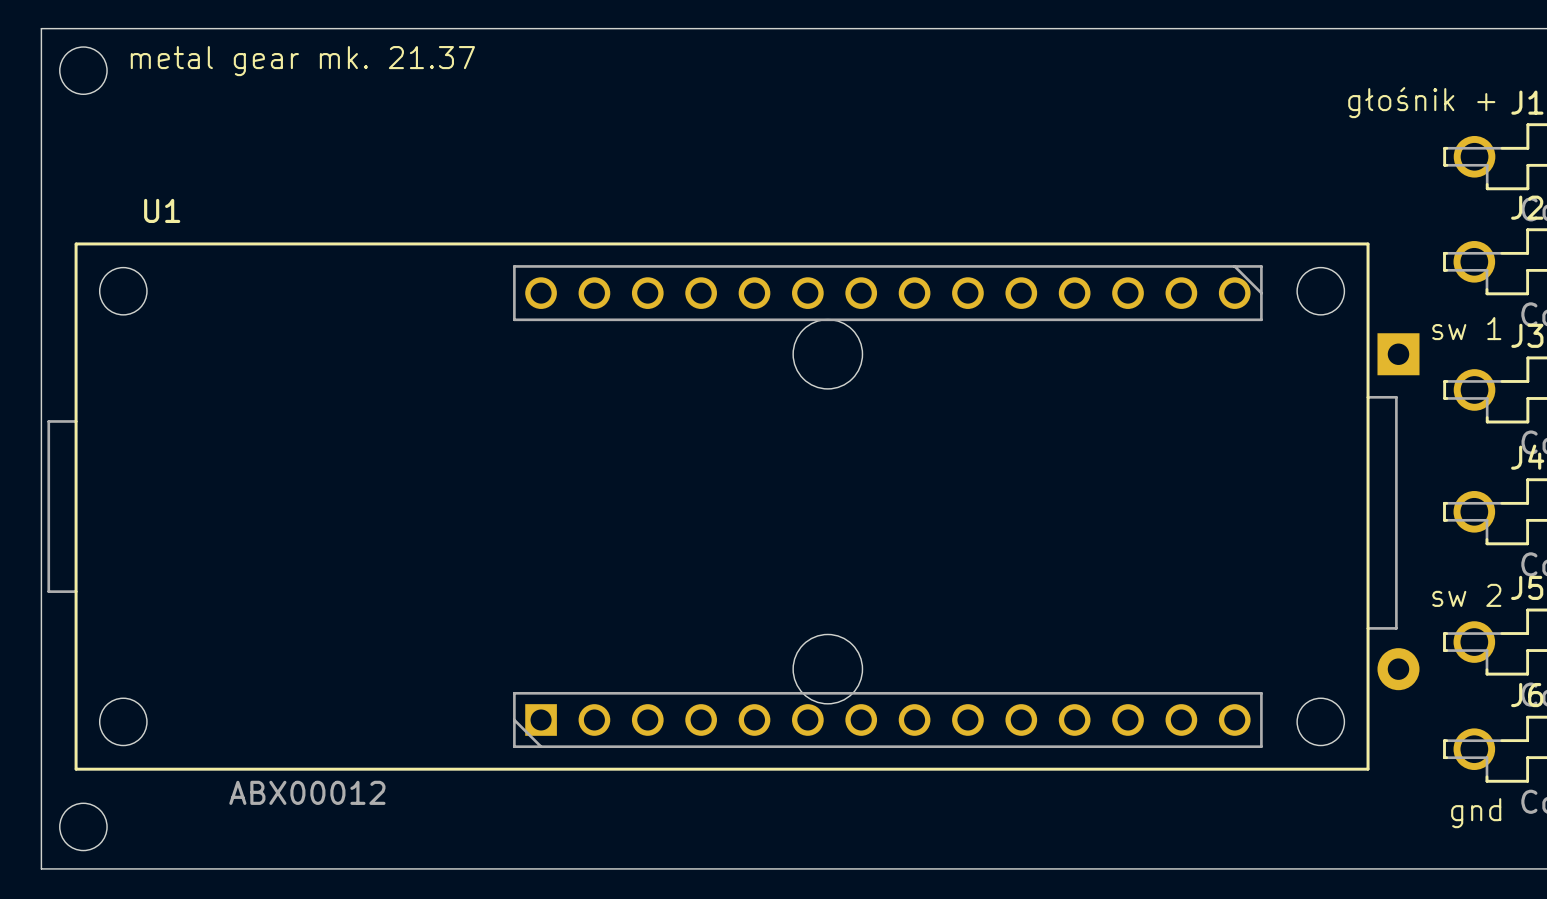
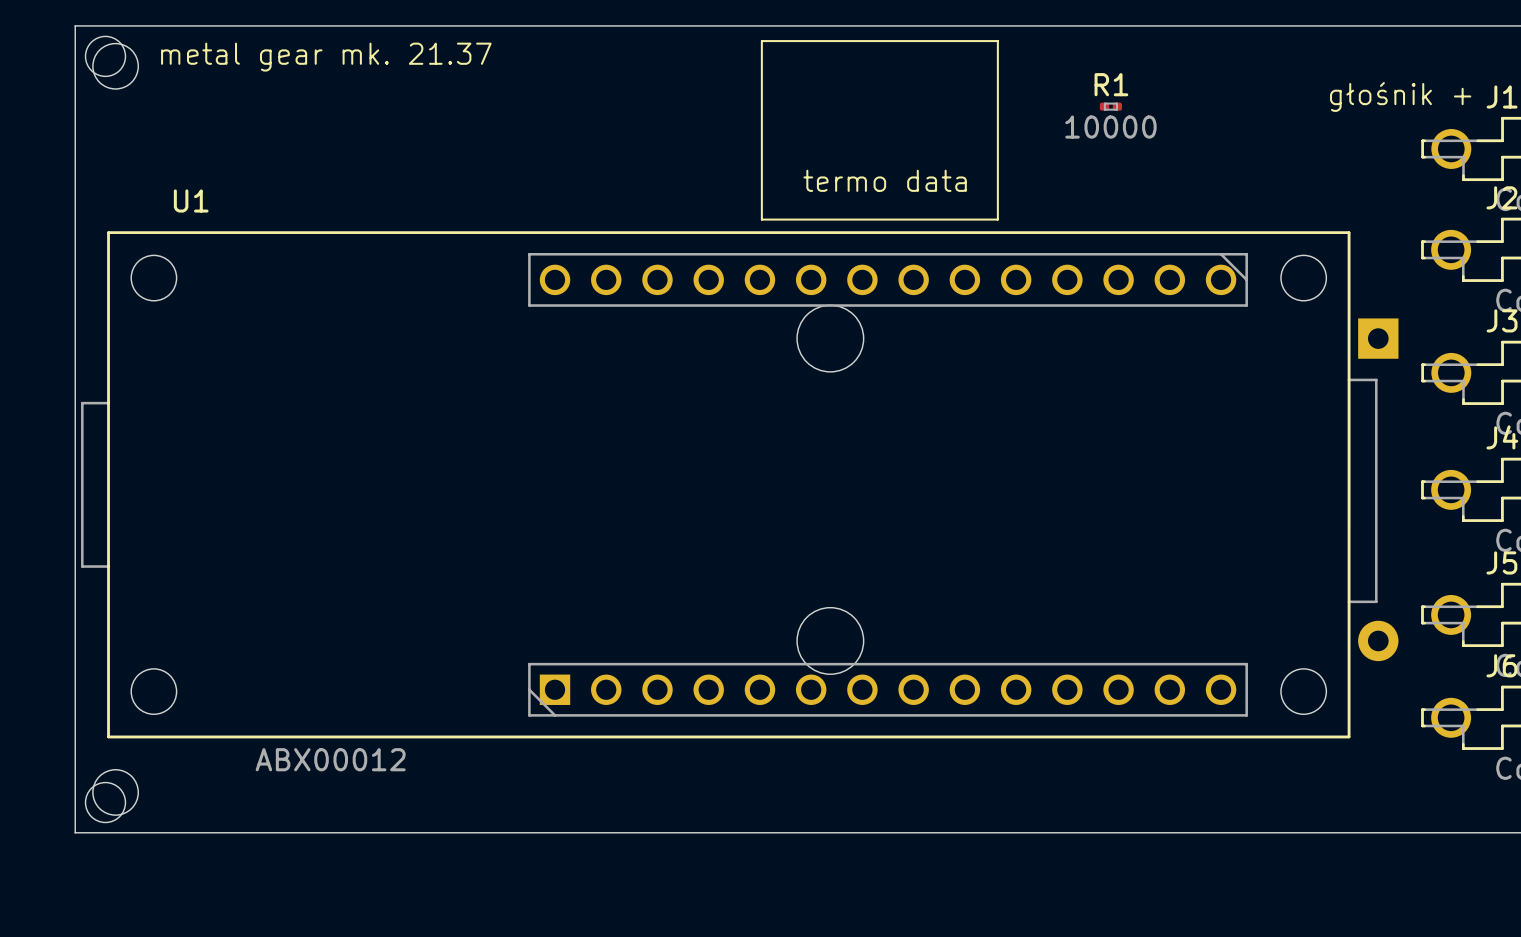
round board edge: none -> [85, 35, 126, 77]
line: none -> (761, 41) (997, 41) (997, 219) (761, 219) (761, 41)
R1: none -> 10000 (1110, 106)
text: none -> termo data (885, 180)
text: sw 1 (1466, 328) -> none
text: sw 2 (1466, 595) -> none
text: gnd (1476, 813) -> none
round board edge: none -> [85, 782, 126, 824]

